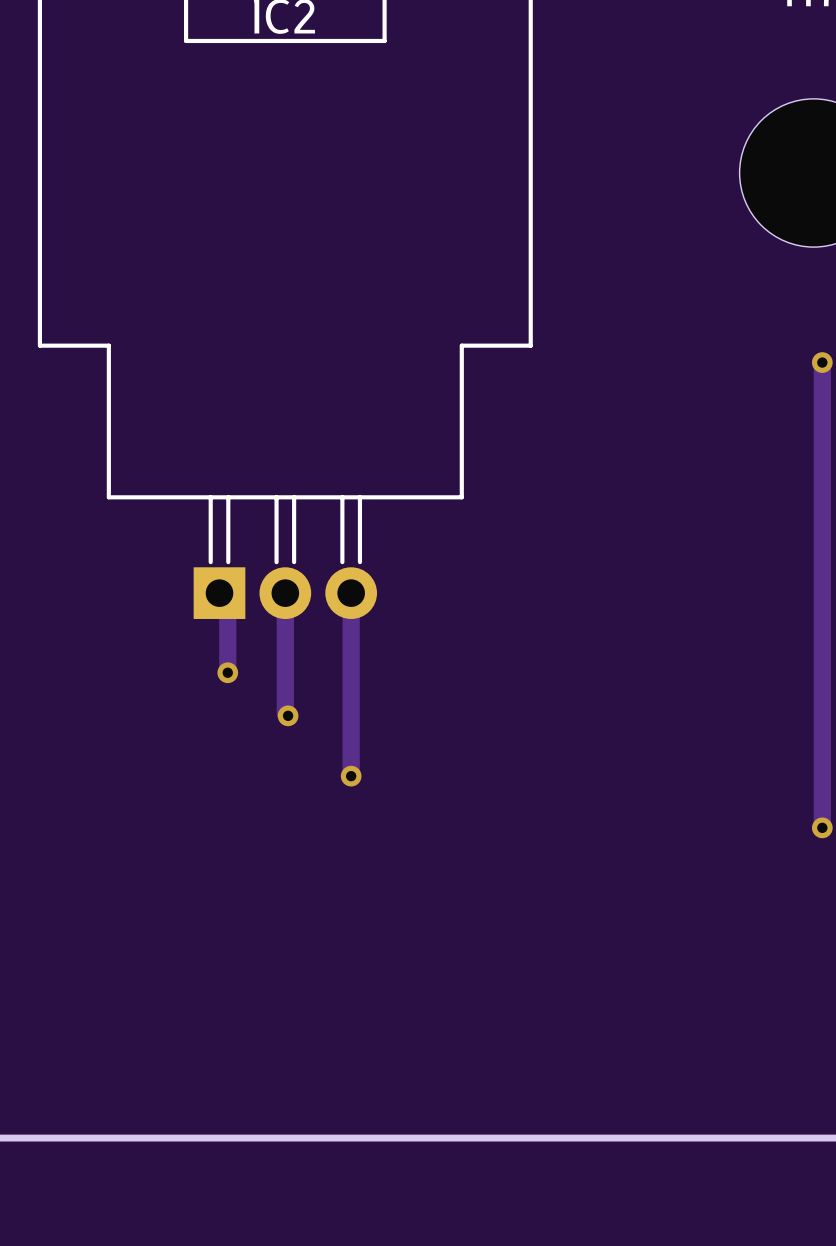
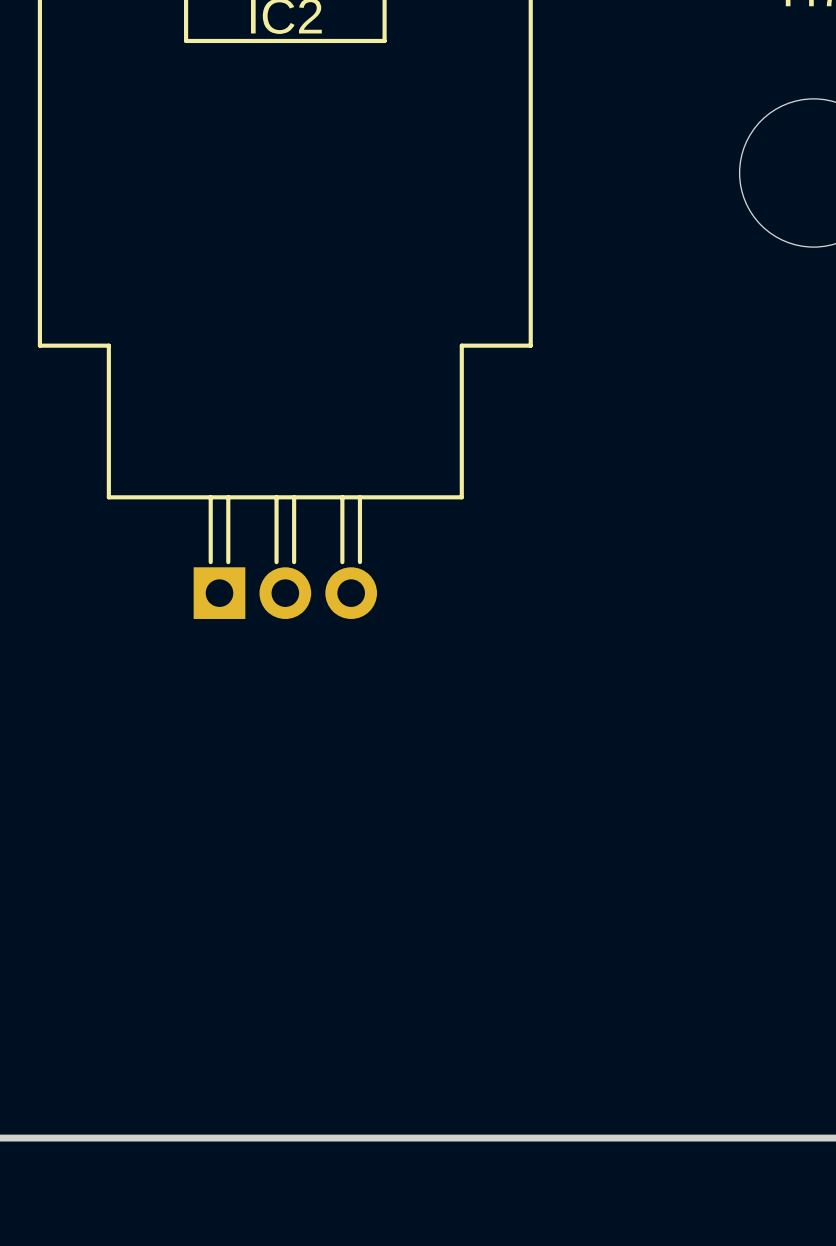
track: (822, 362) (822, 827) -> none
via: (822, 362) -> none
track: (219, 593) (227, 601) (227, 672) -> none
track: (285, 593) (285, 713) (288, 715) -> none
track: (351, 593) (351, 776) -> none
via: (227, 672) -> none
via: (288, 715) -> none
via: (351, 776) -> none
via: (822, 827) -> none

